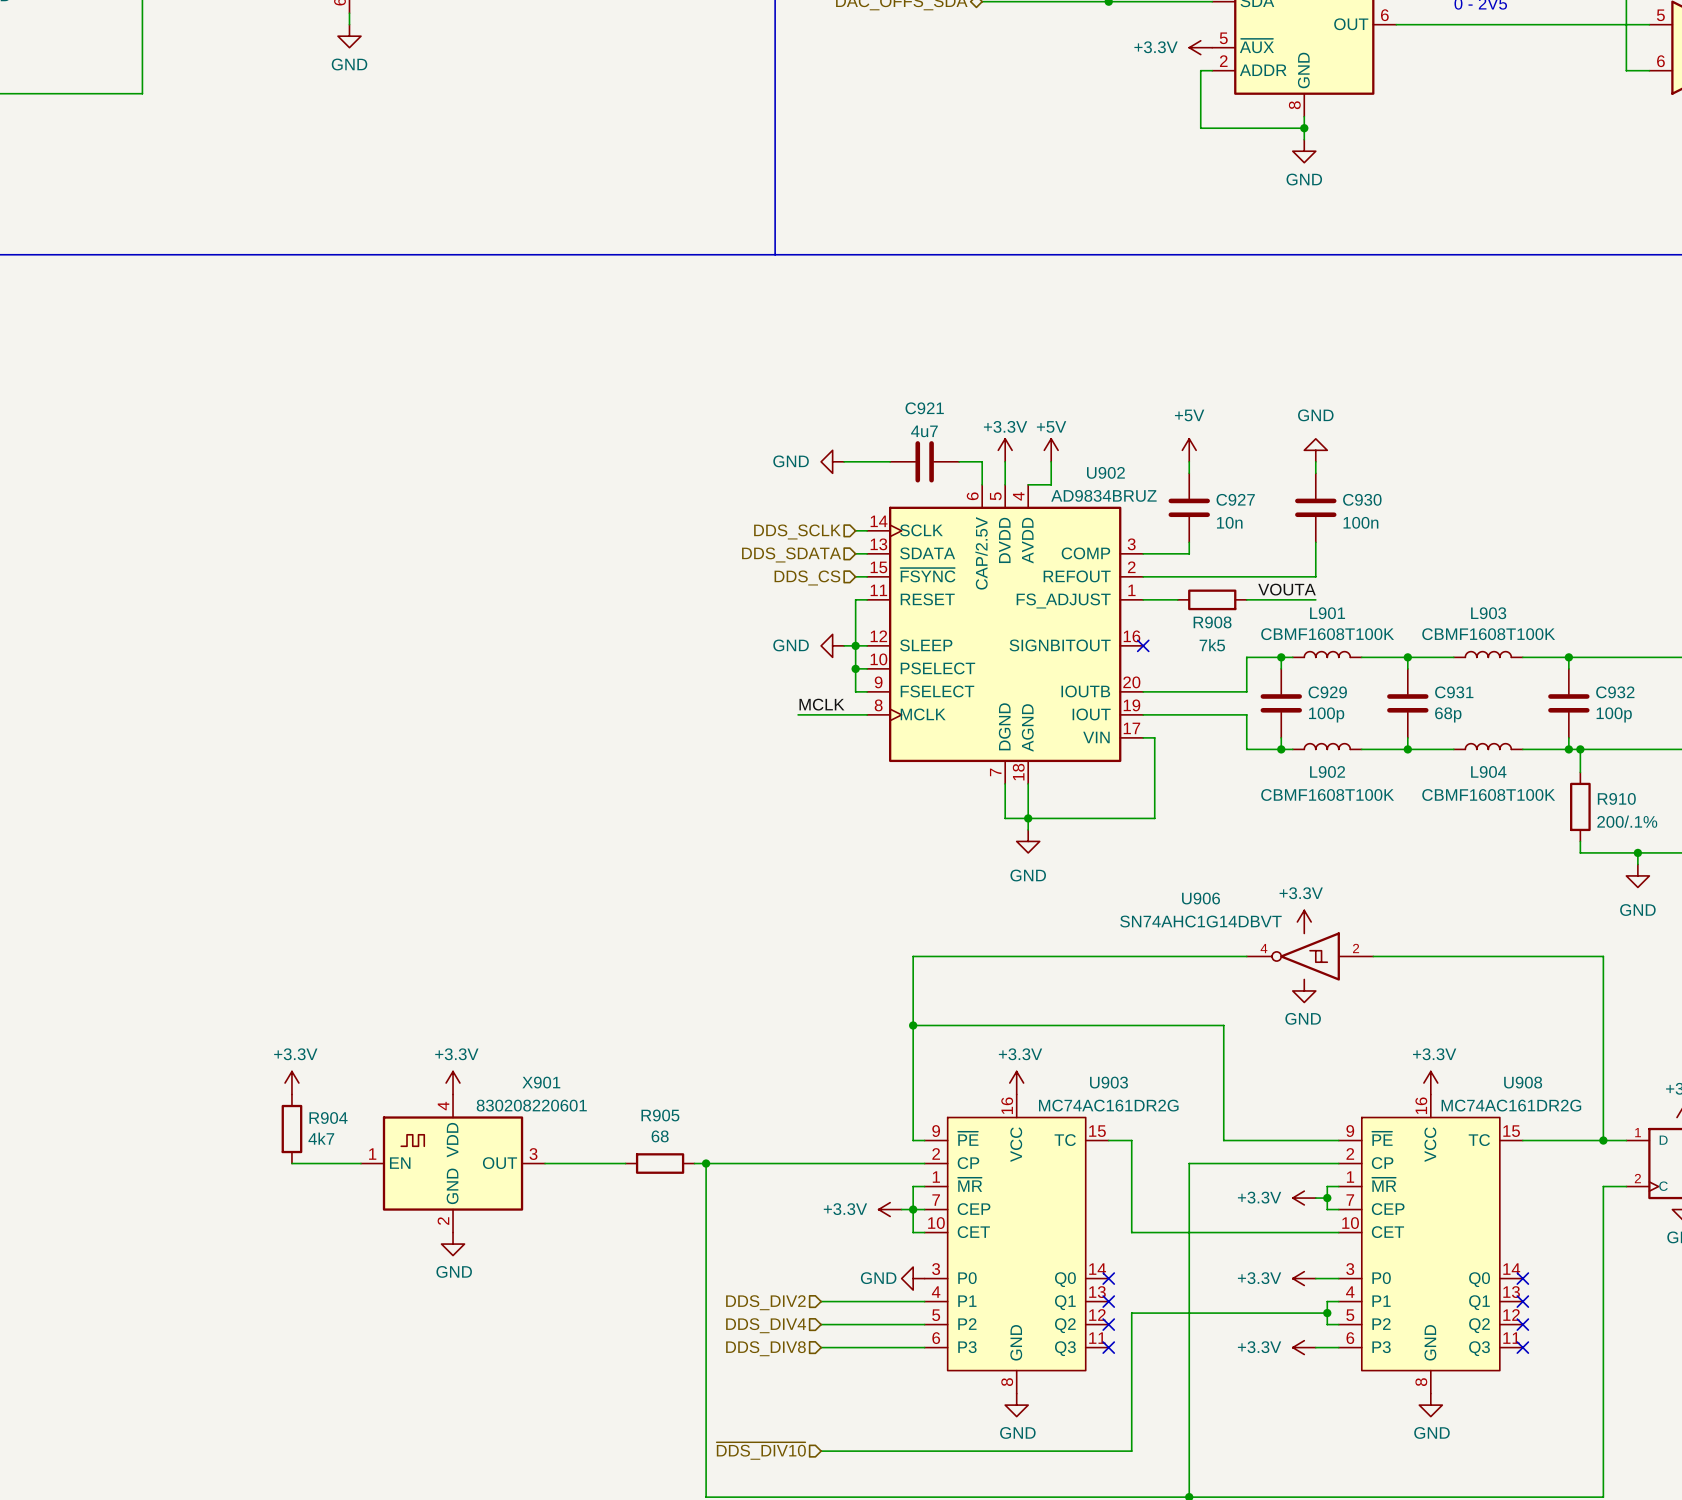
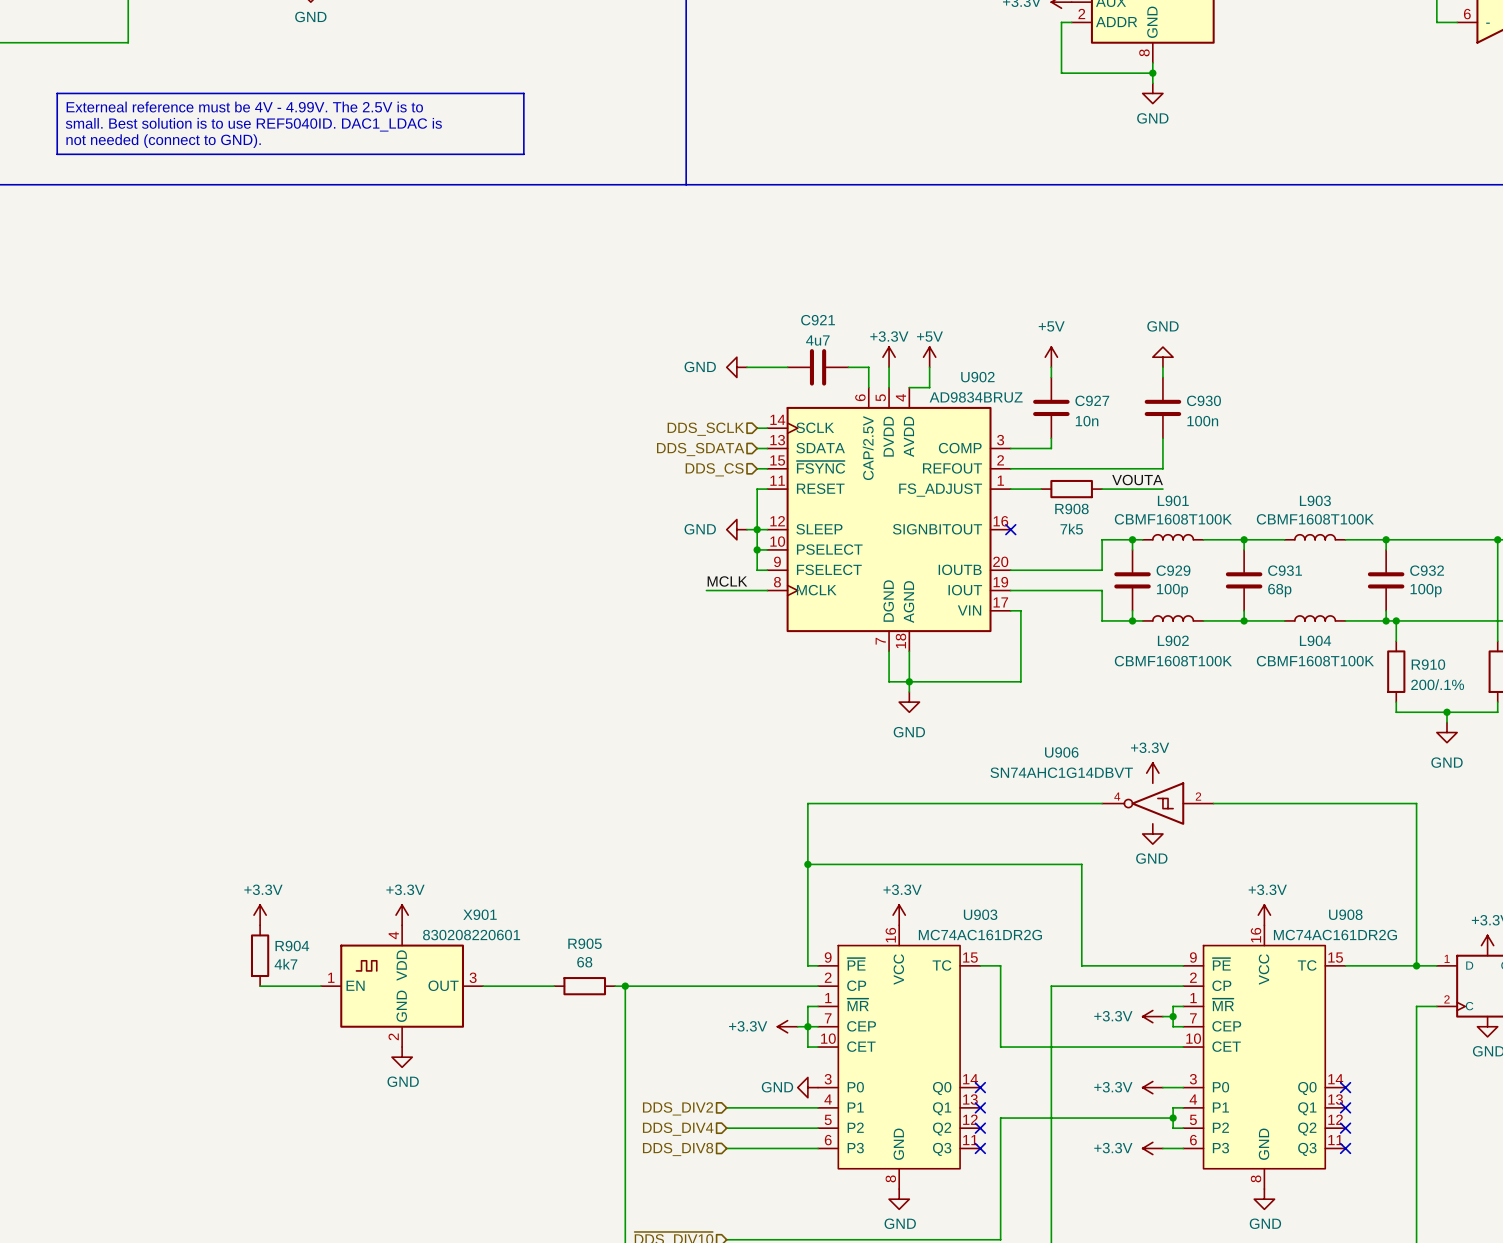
line: none -> (57, 93) (523, 93) (523, 154) (57, 154) (57, 93)
text: none -> Externeal reference must be 4V - 4.99V. The 2.5V is to (244, 107)
text: none -> small. Best solution is to use REF5040ID. DAC1_LDAC is (253, 124)
text: none -> not needed (connect to GND). (163, 141)

